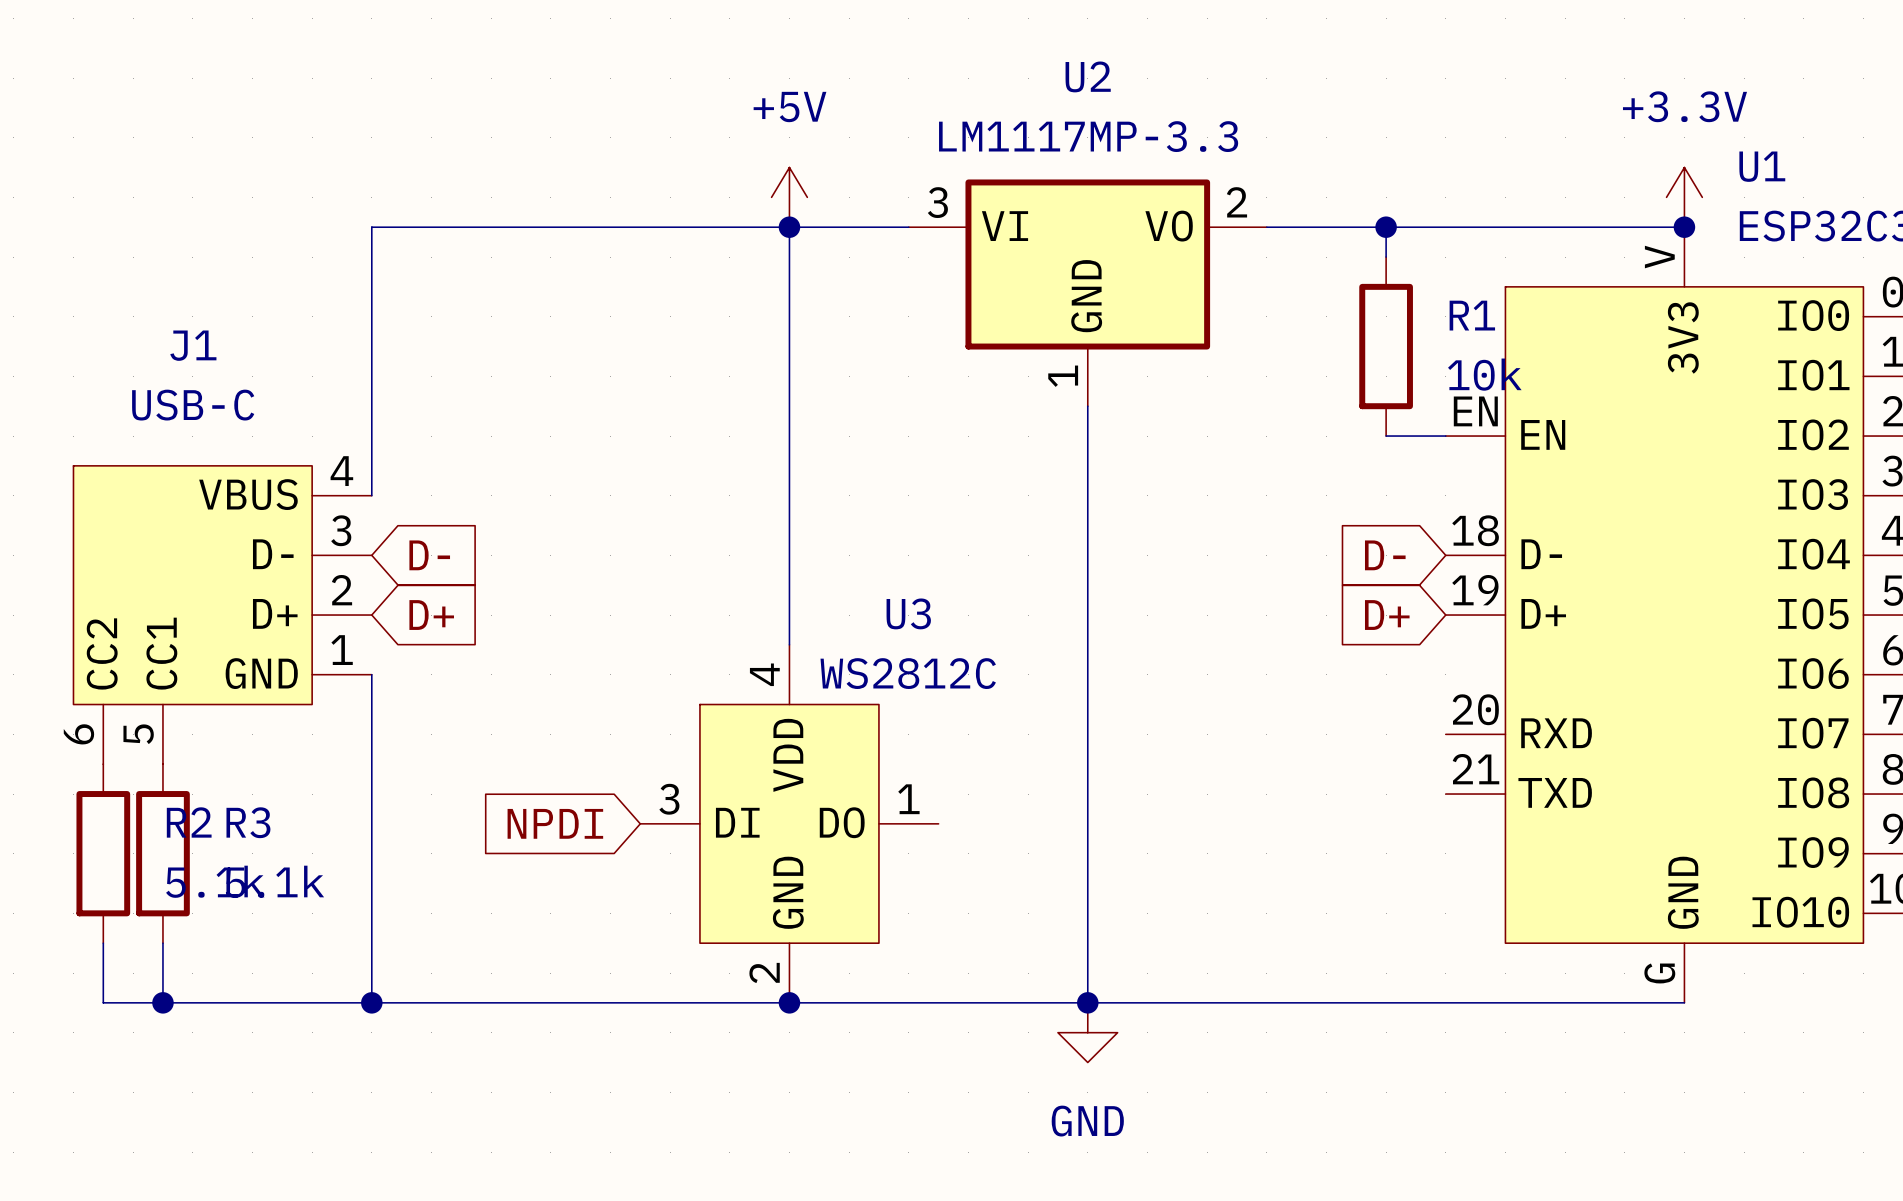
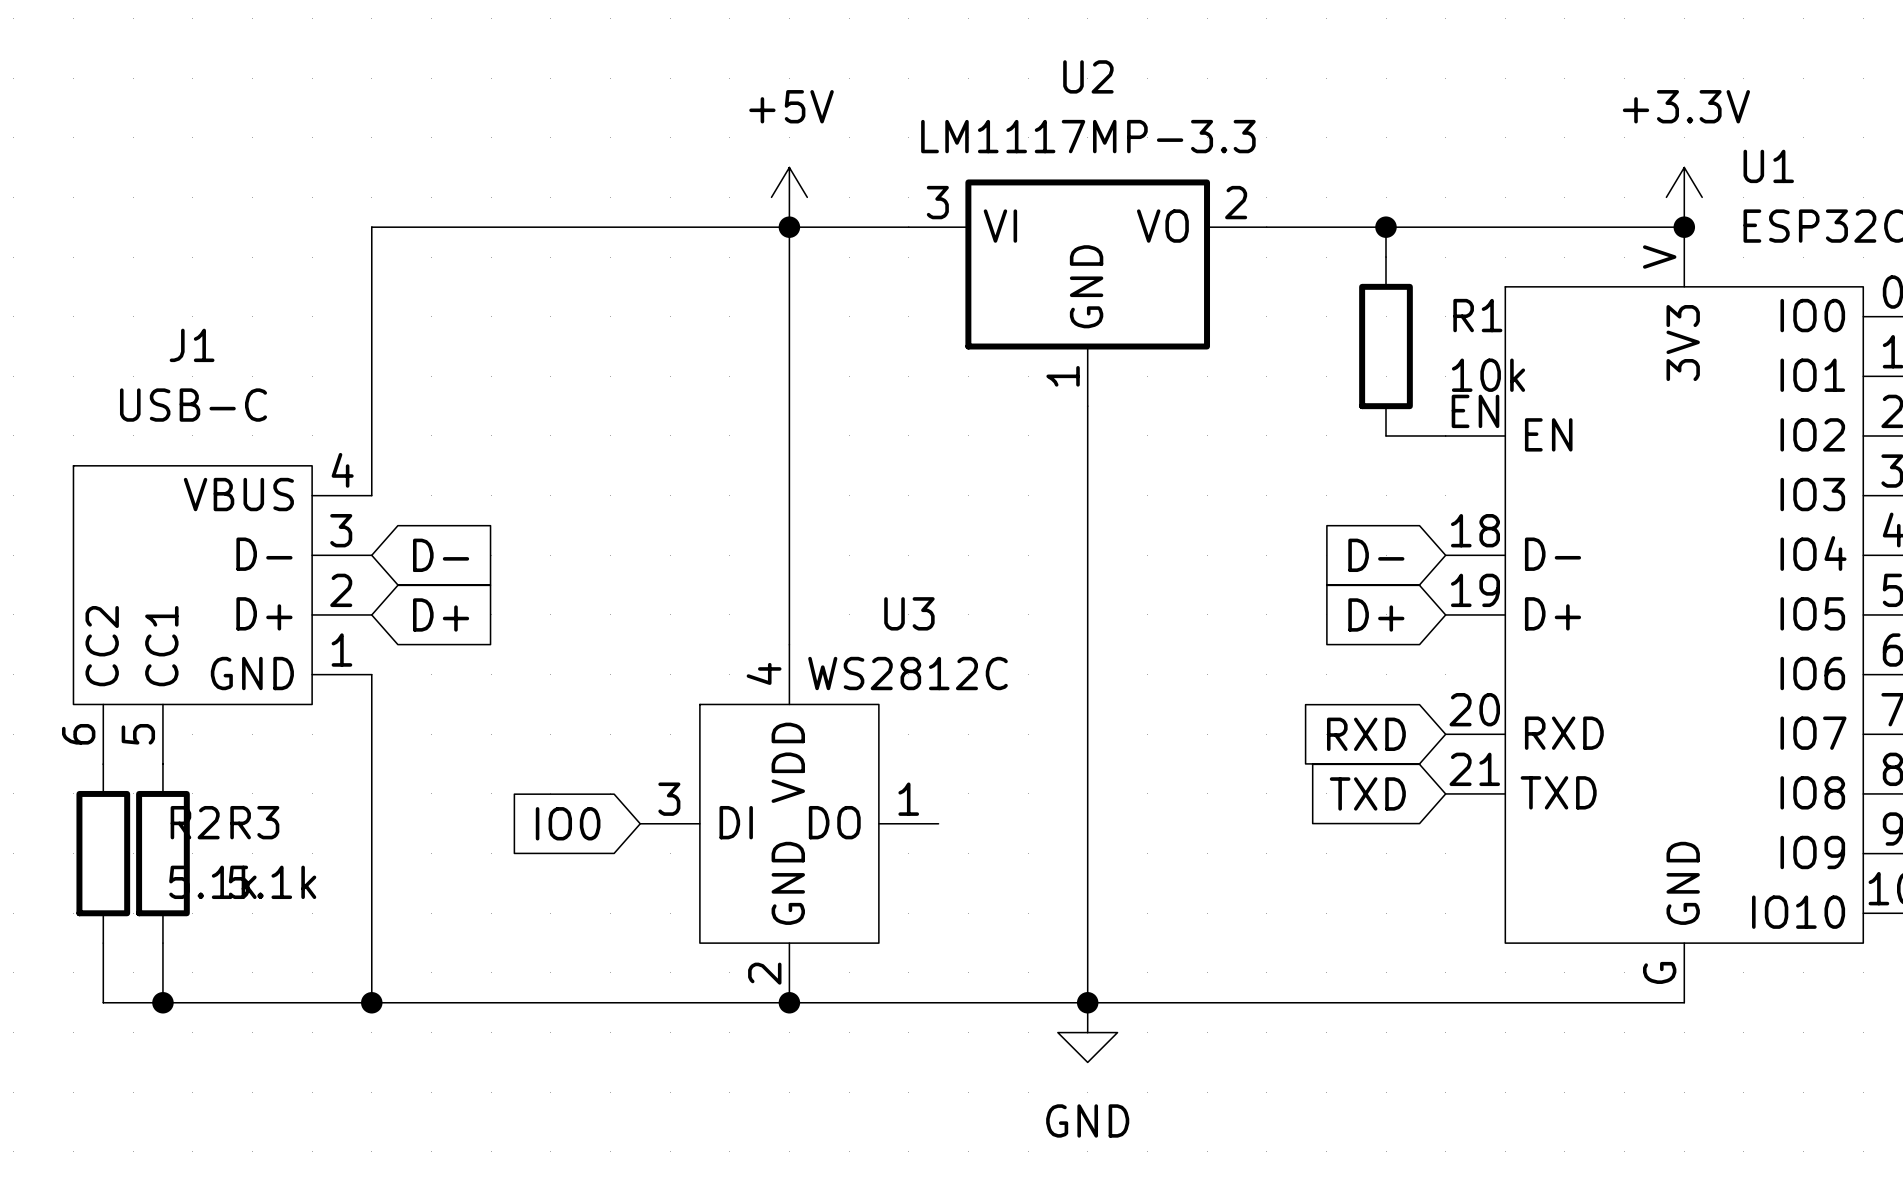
global label: none -> RXD (1366, 734)
global label: none -> TXD (1367, 793)
global label: NPDI (555, 823) -> IO0 (568, 823)

